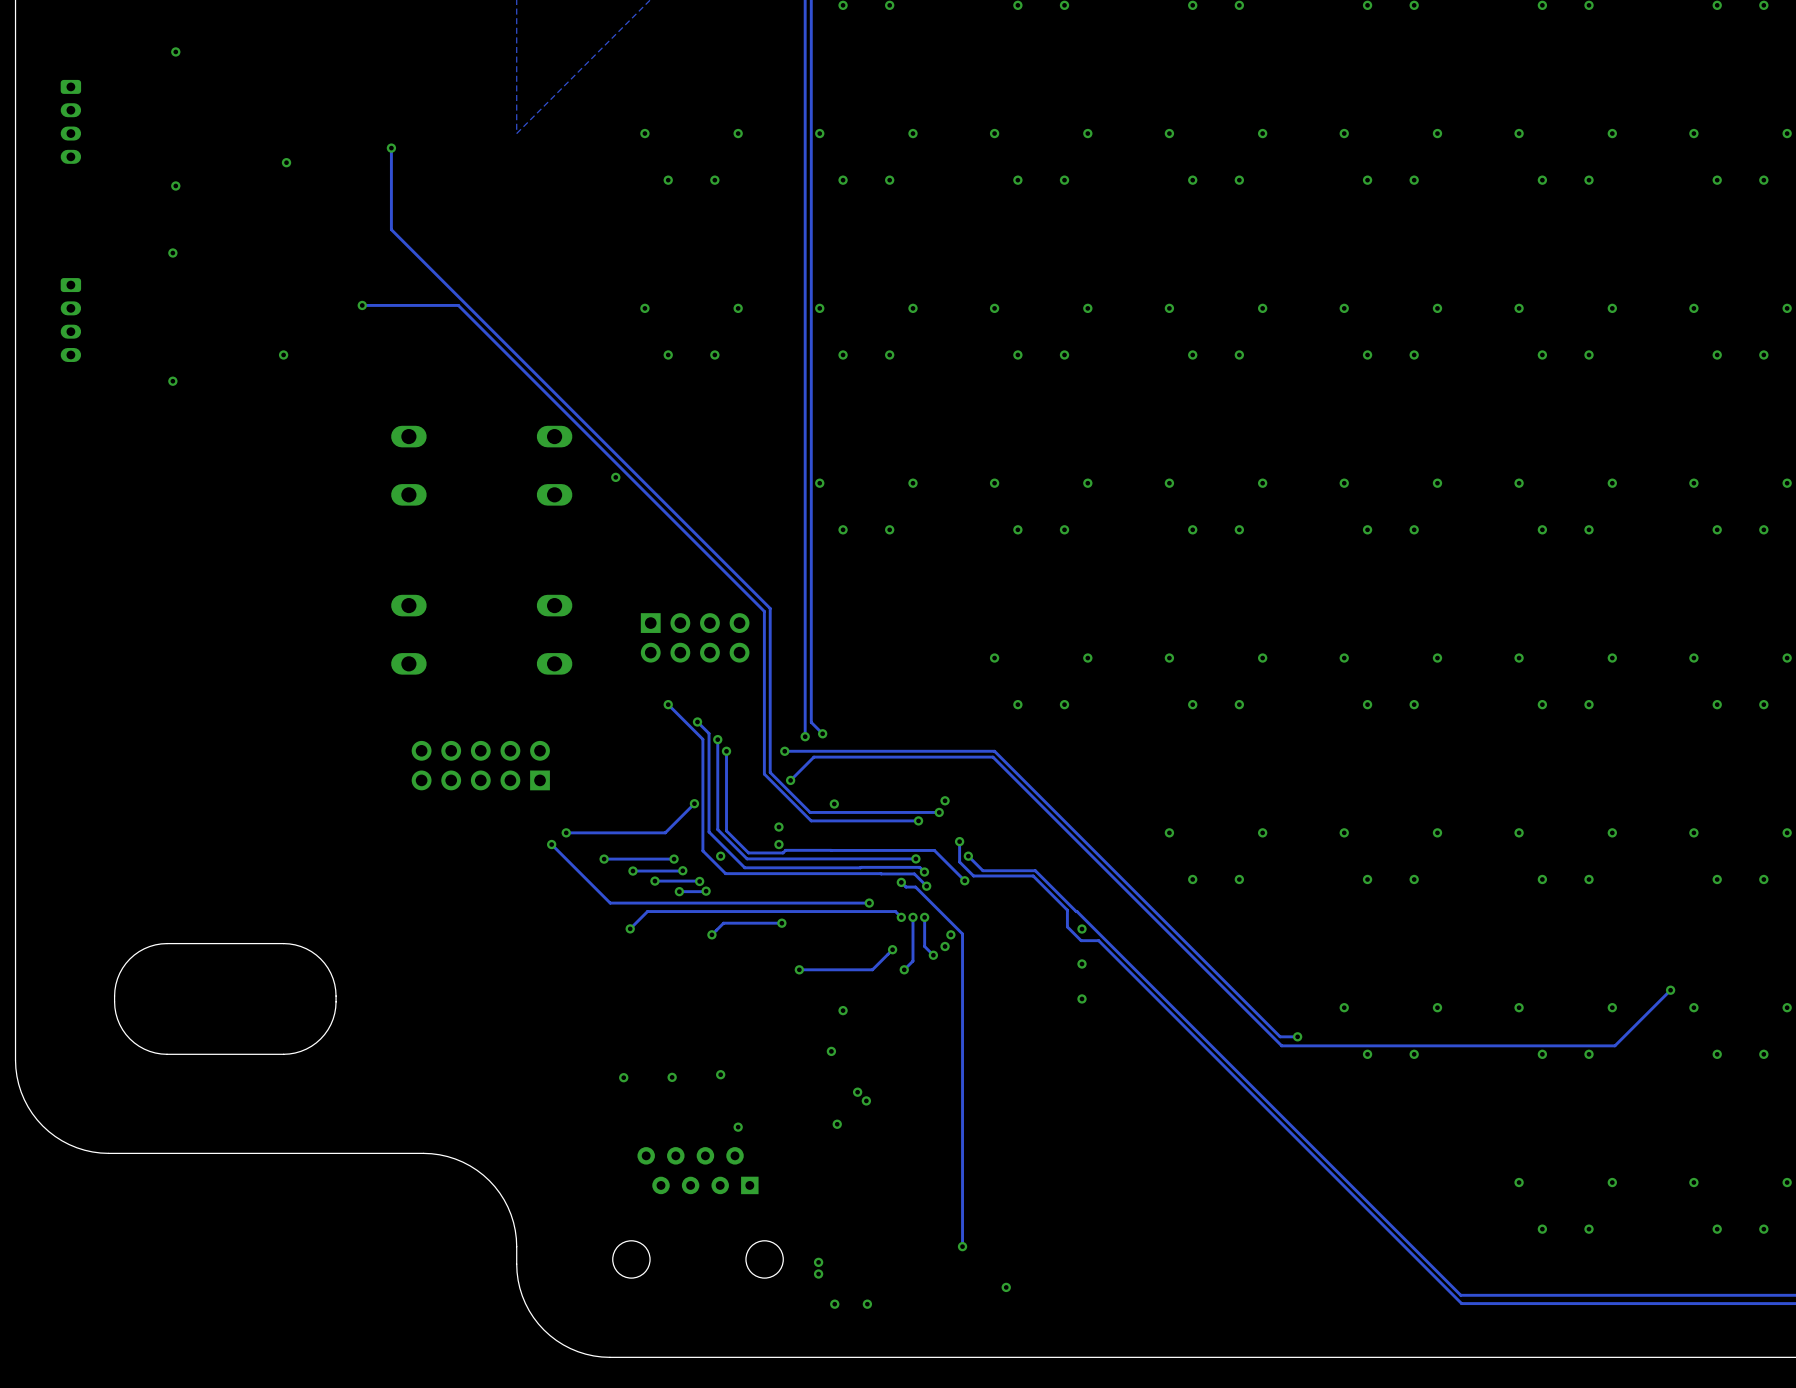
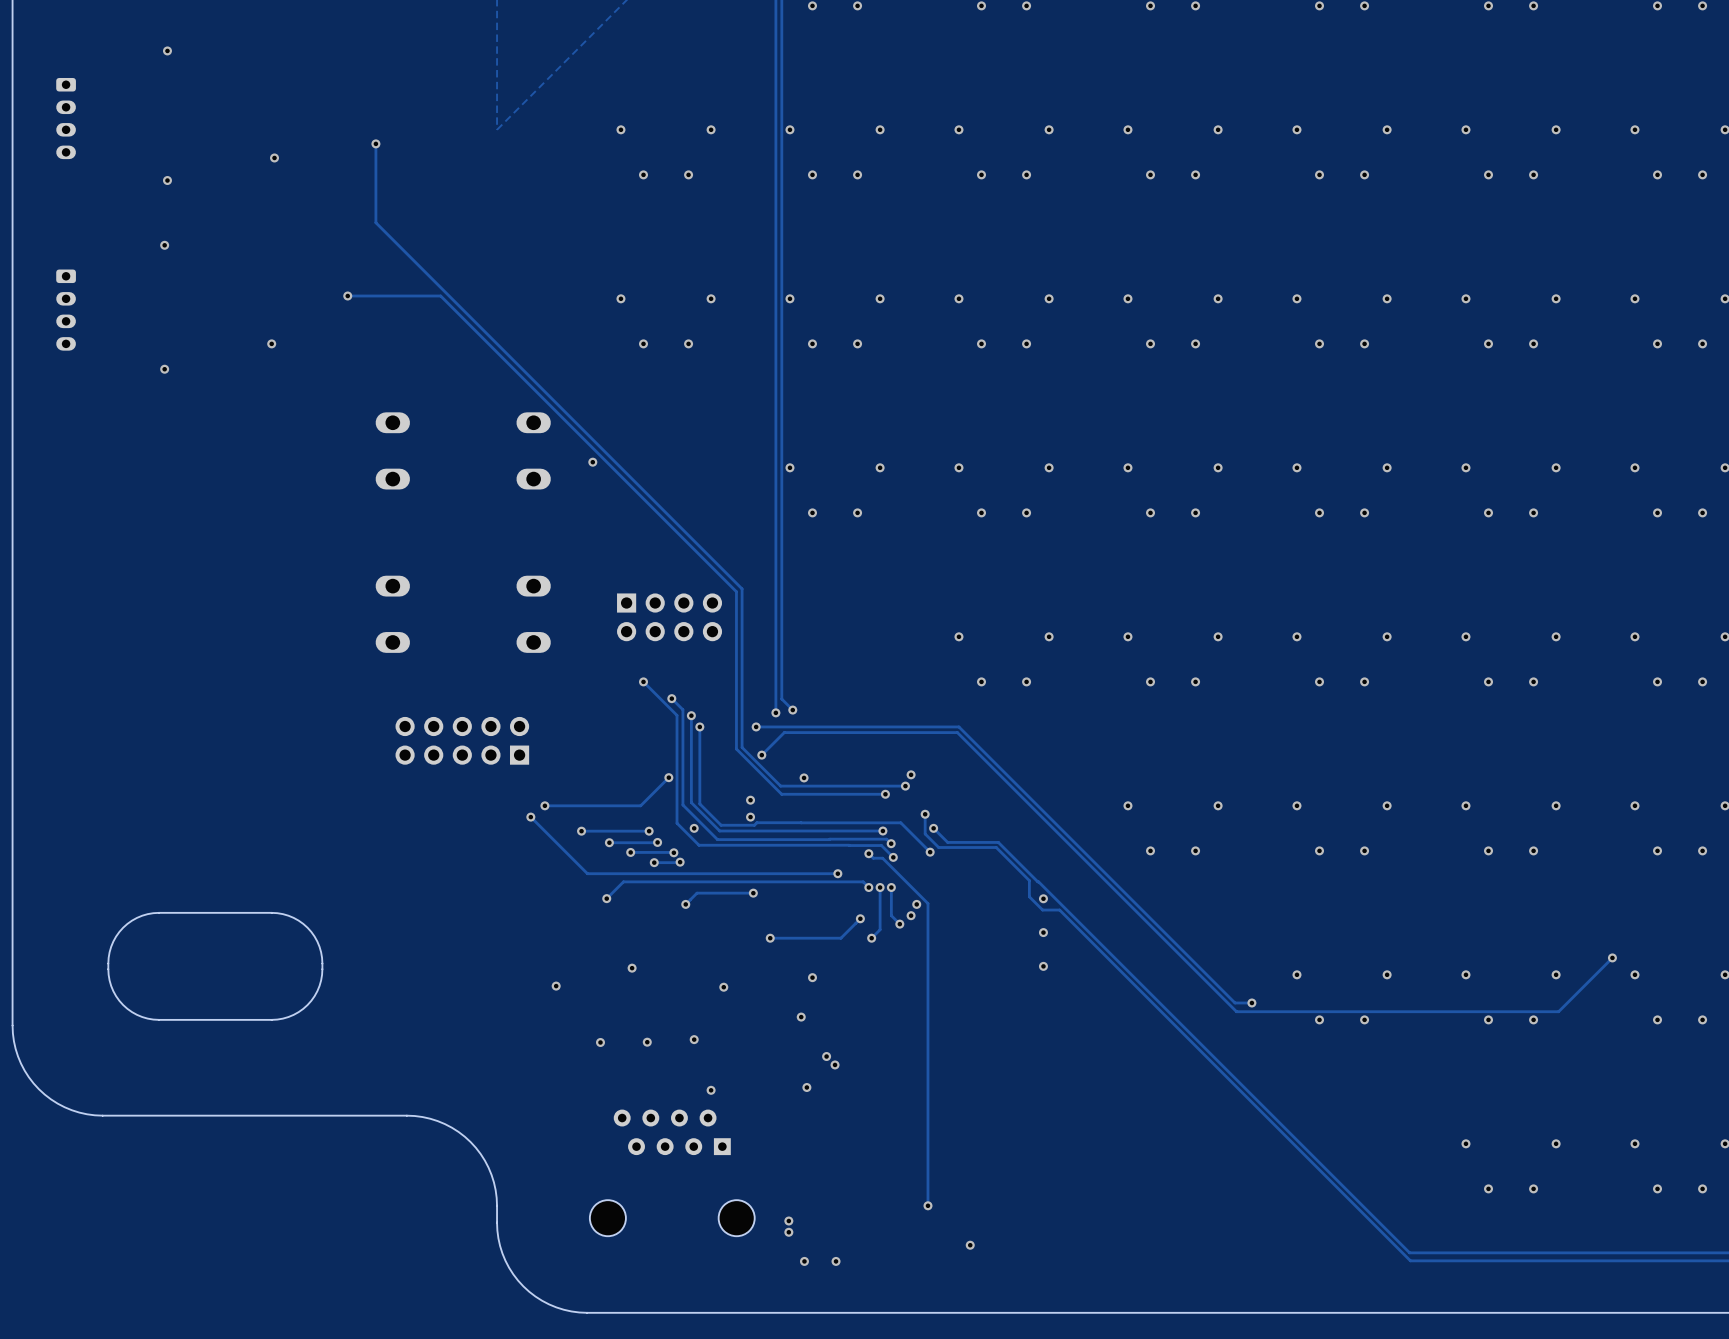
via: none -> (632, 968)
via: none -> (556, 986)
via: none -> (723, 987)

